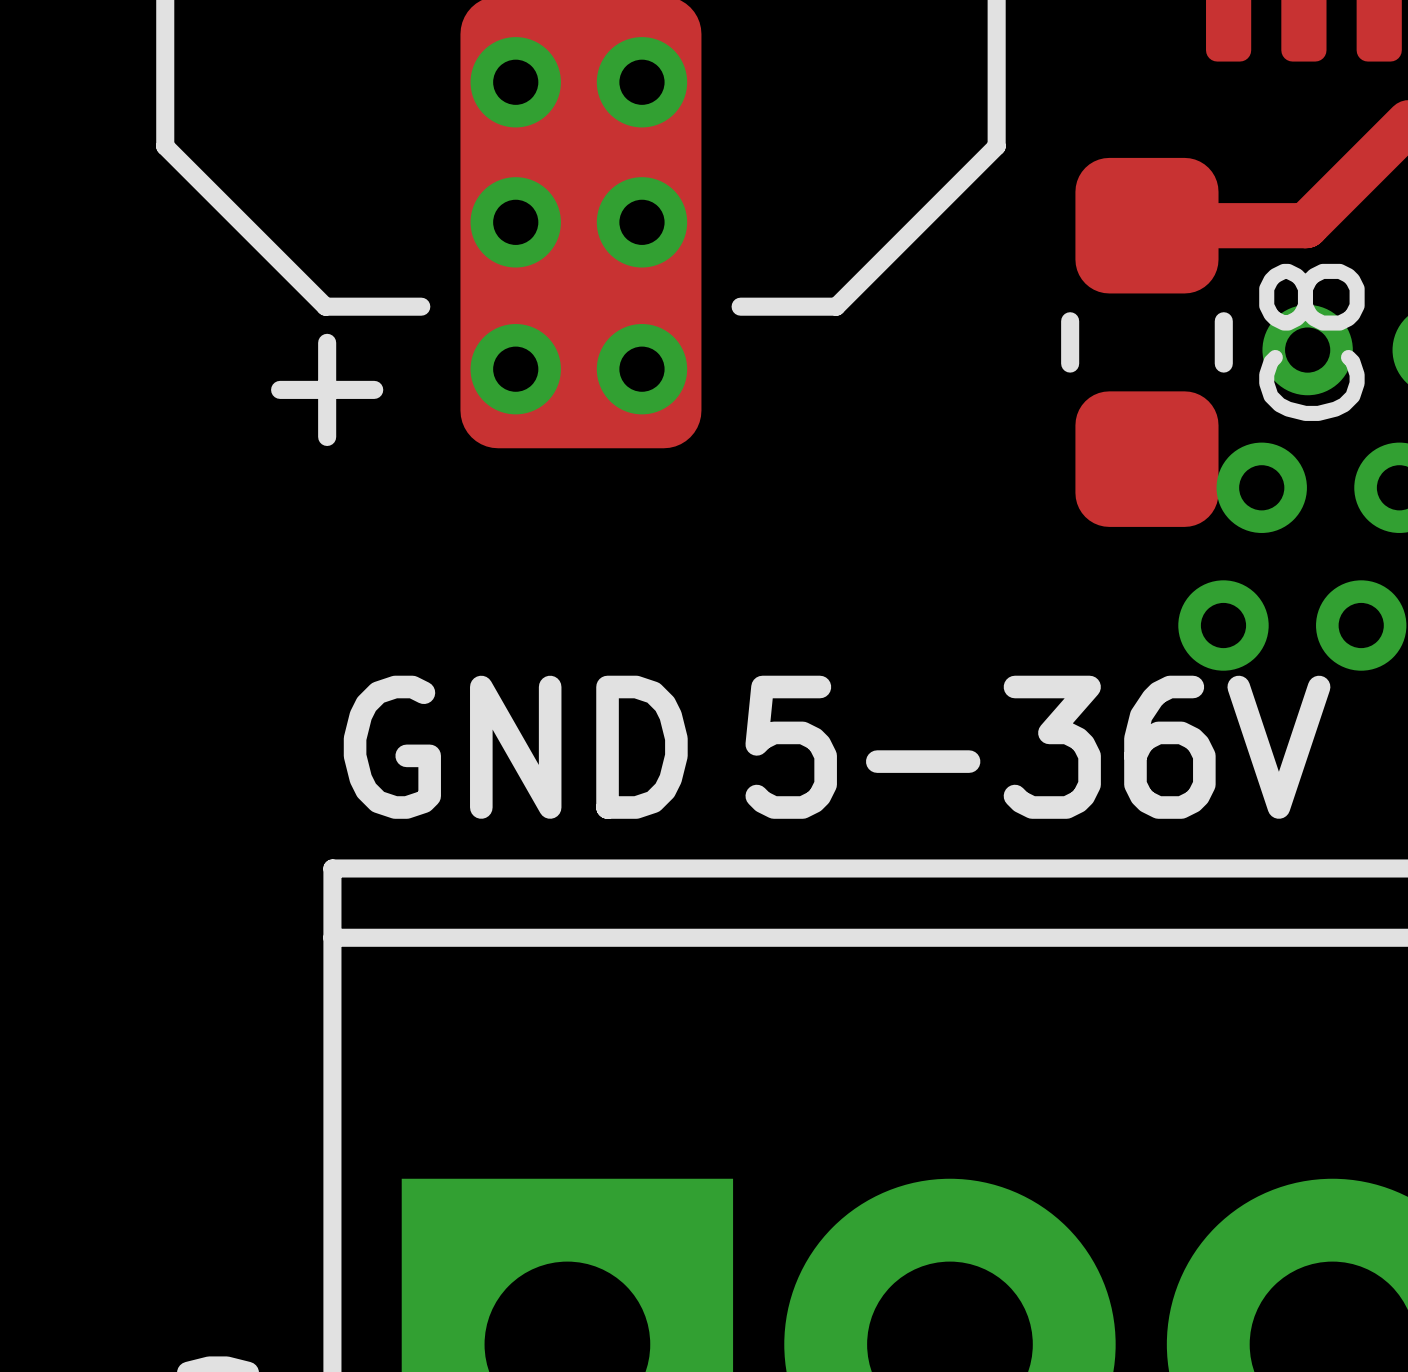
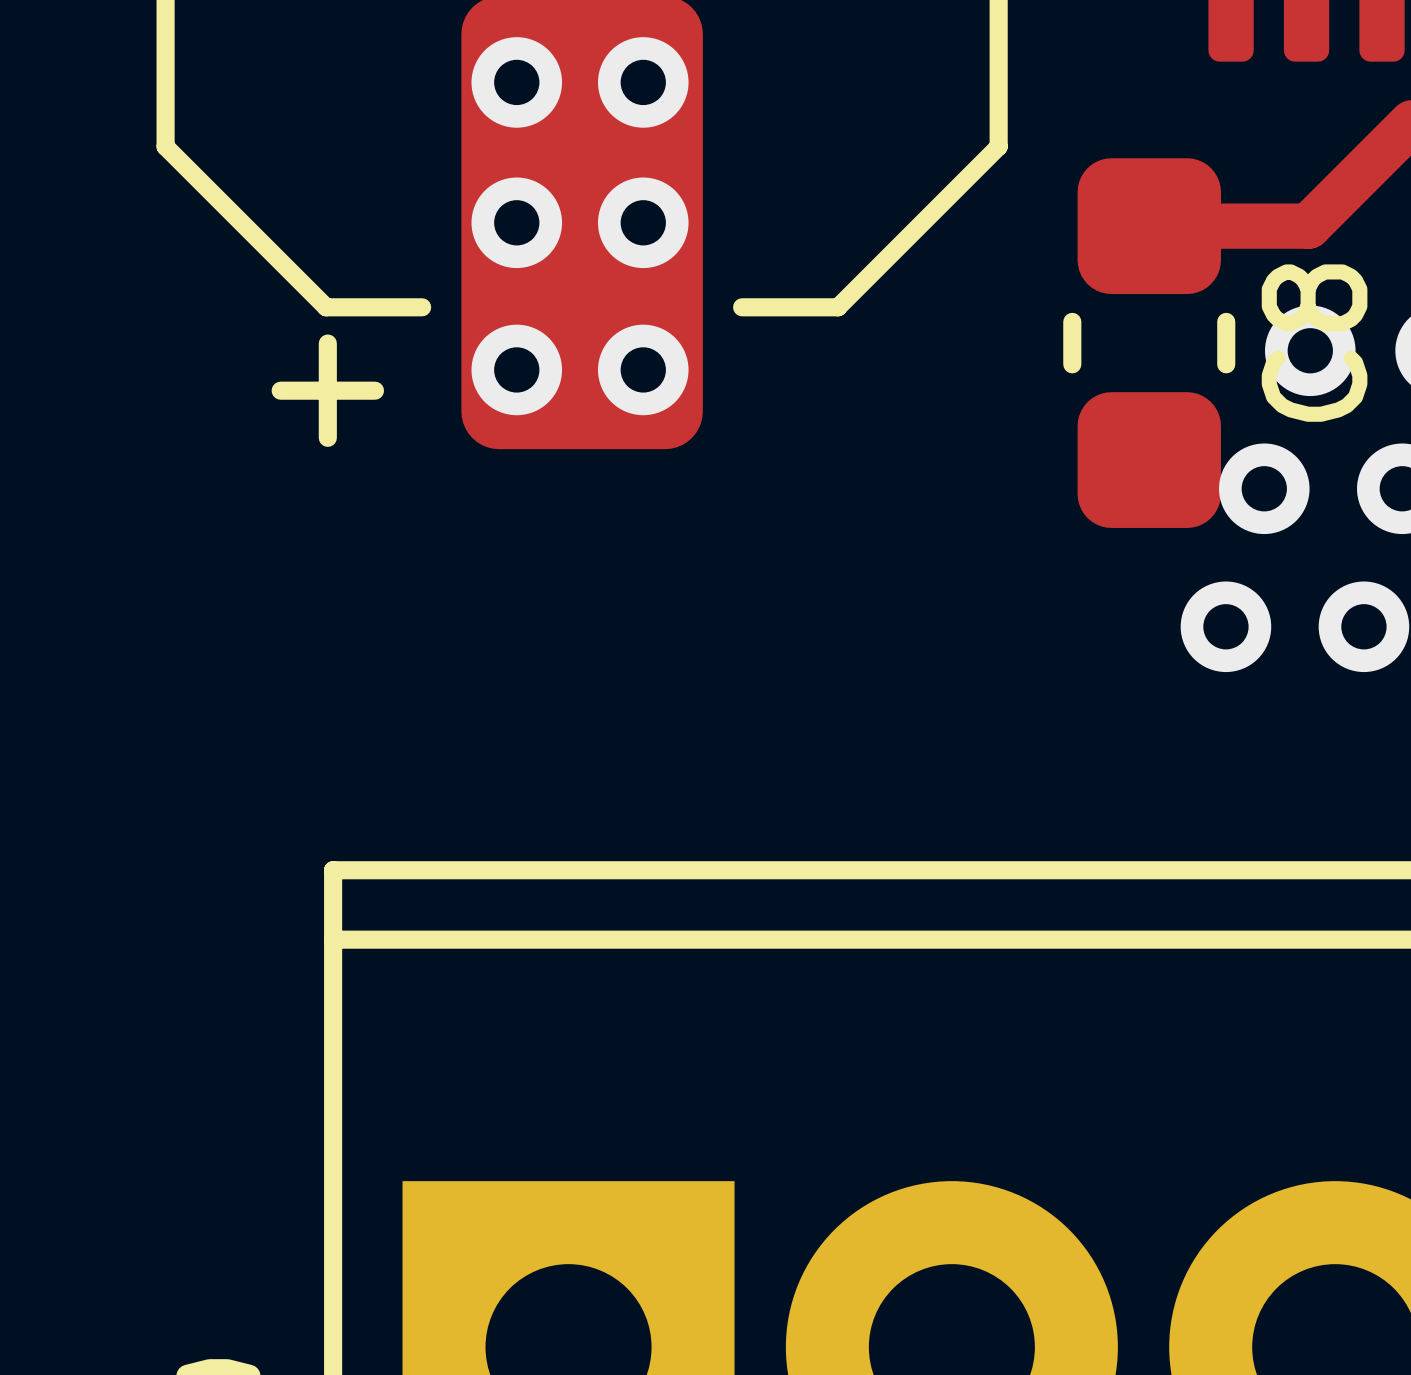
text: GND (515, 747) -> none
text: 5-36V (1037, 747) -> none

